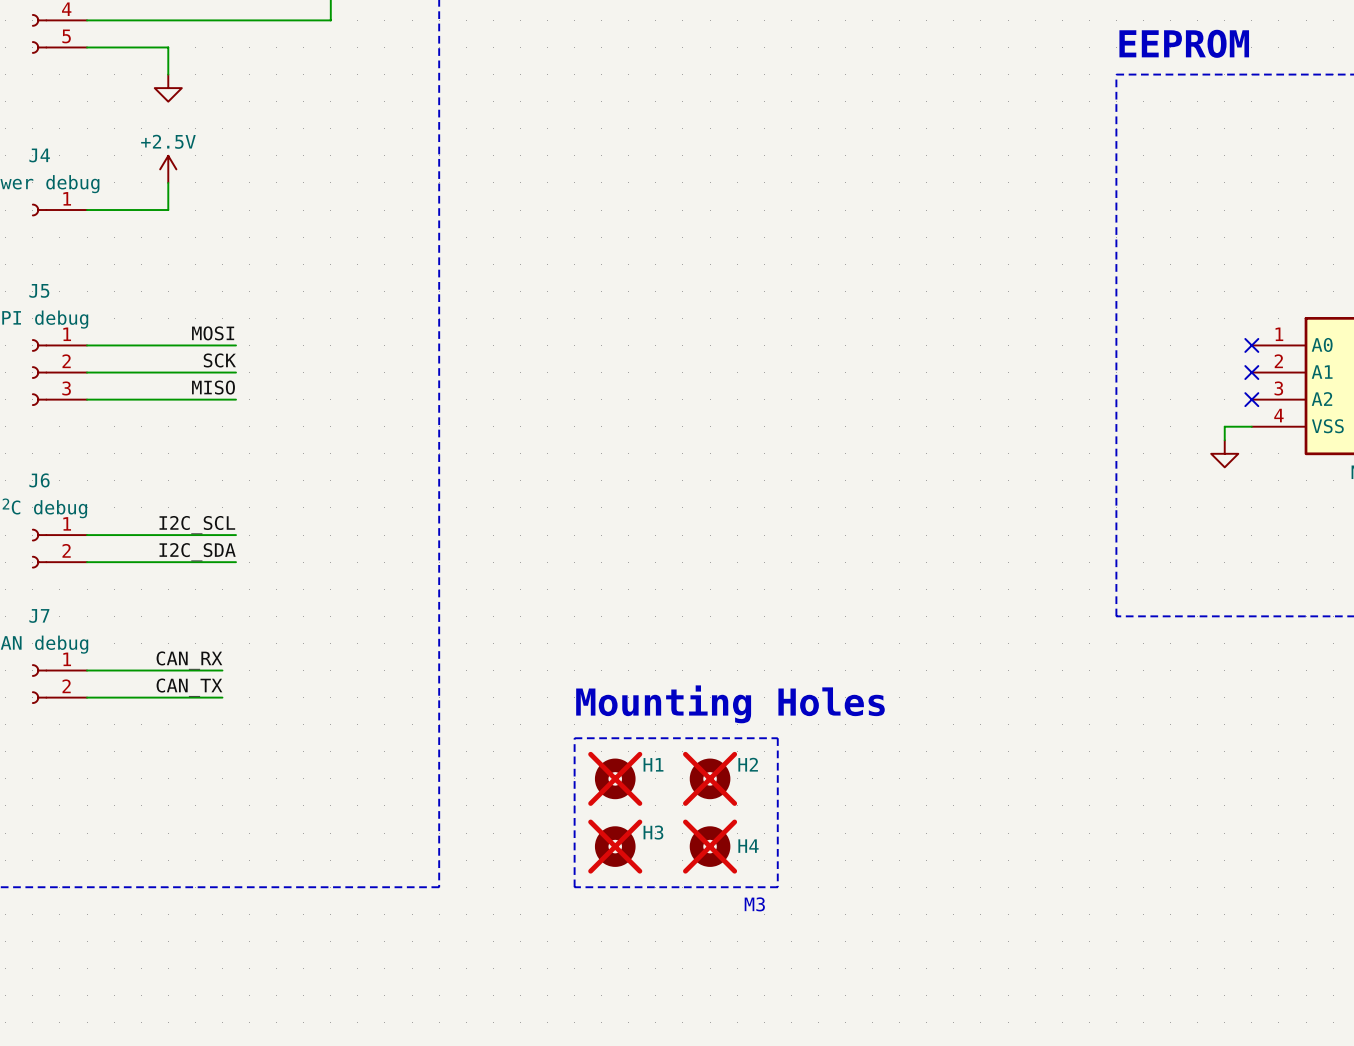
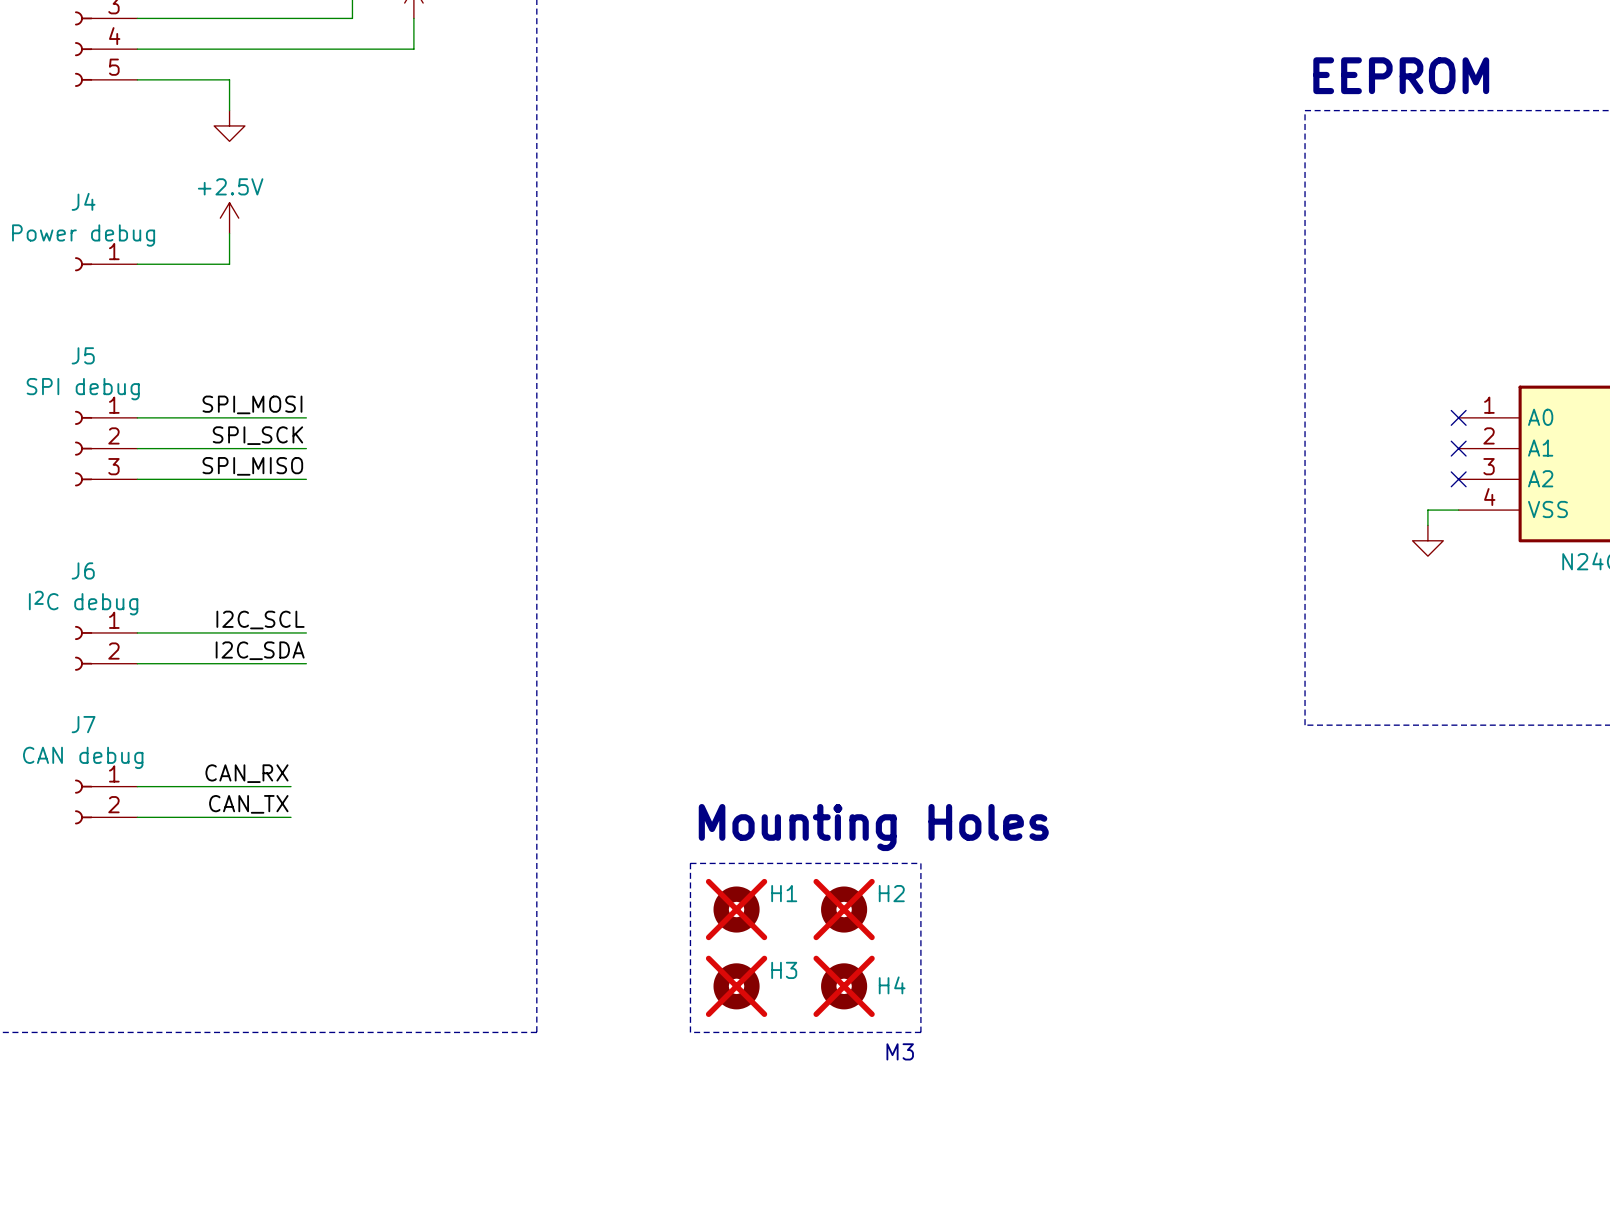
label: MOSI (213, 333) -> SPI_MOSI (252, 404)
label: SCK (219, 360) -> SPI_SCK (257, 435)
label: MISO (213, 387) -> SPI_MISO (252, 466)

